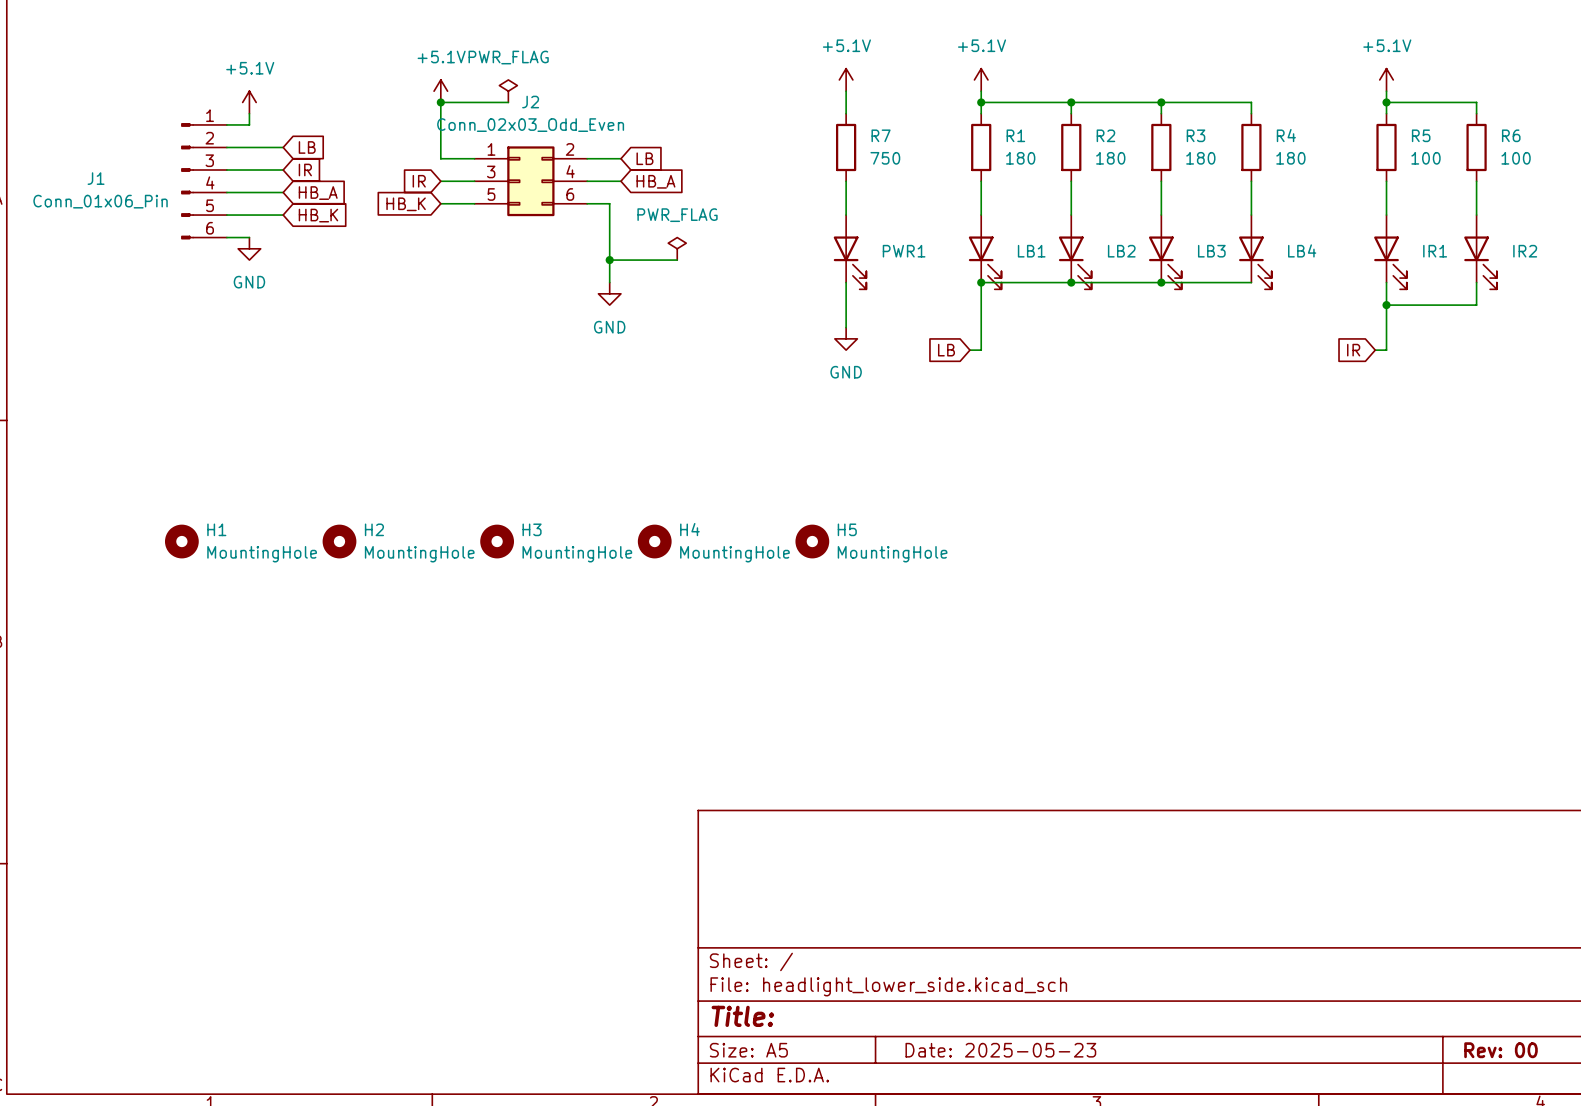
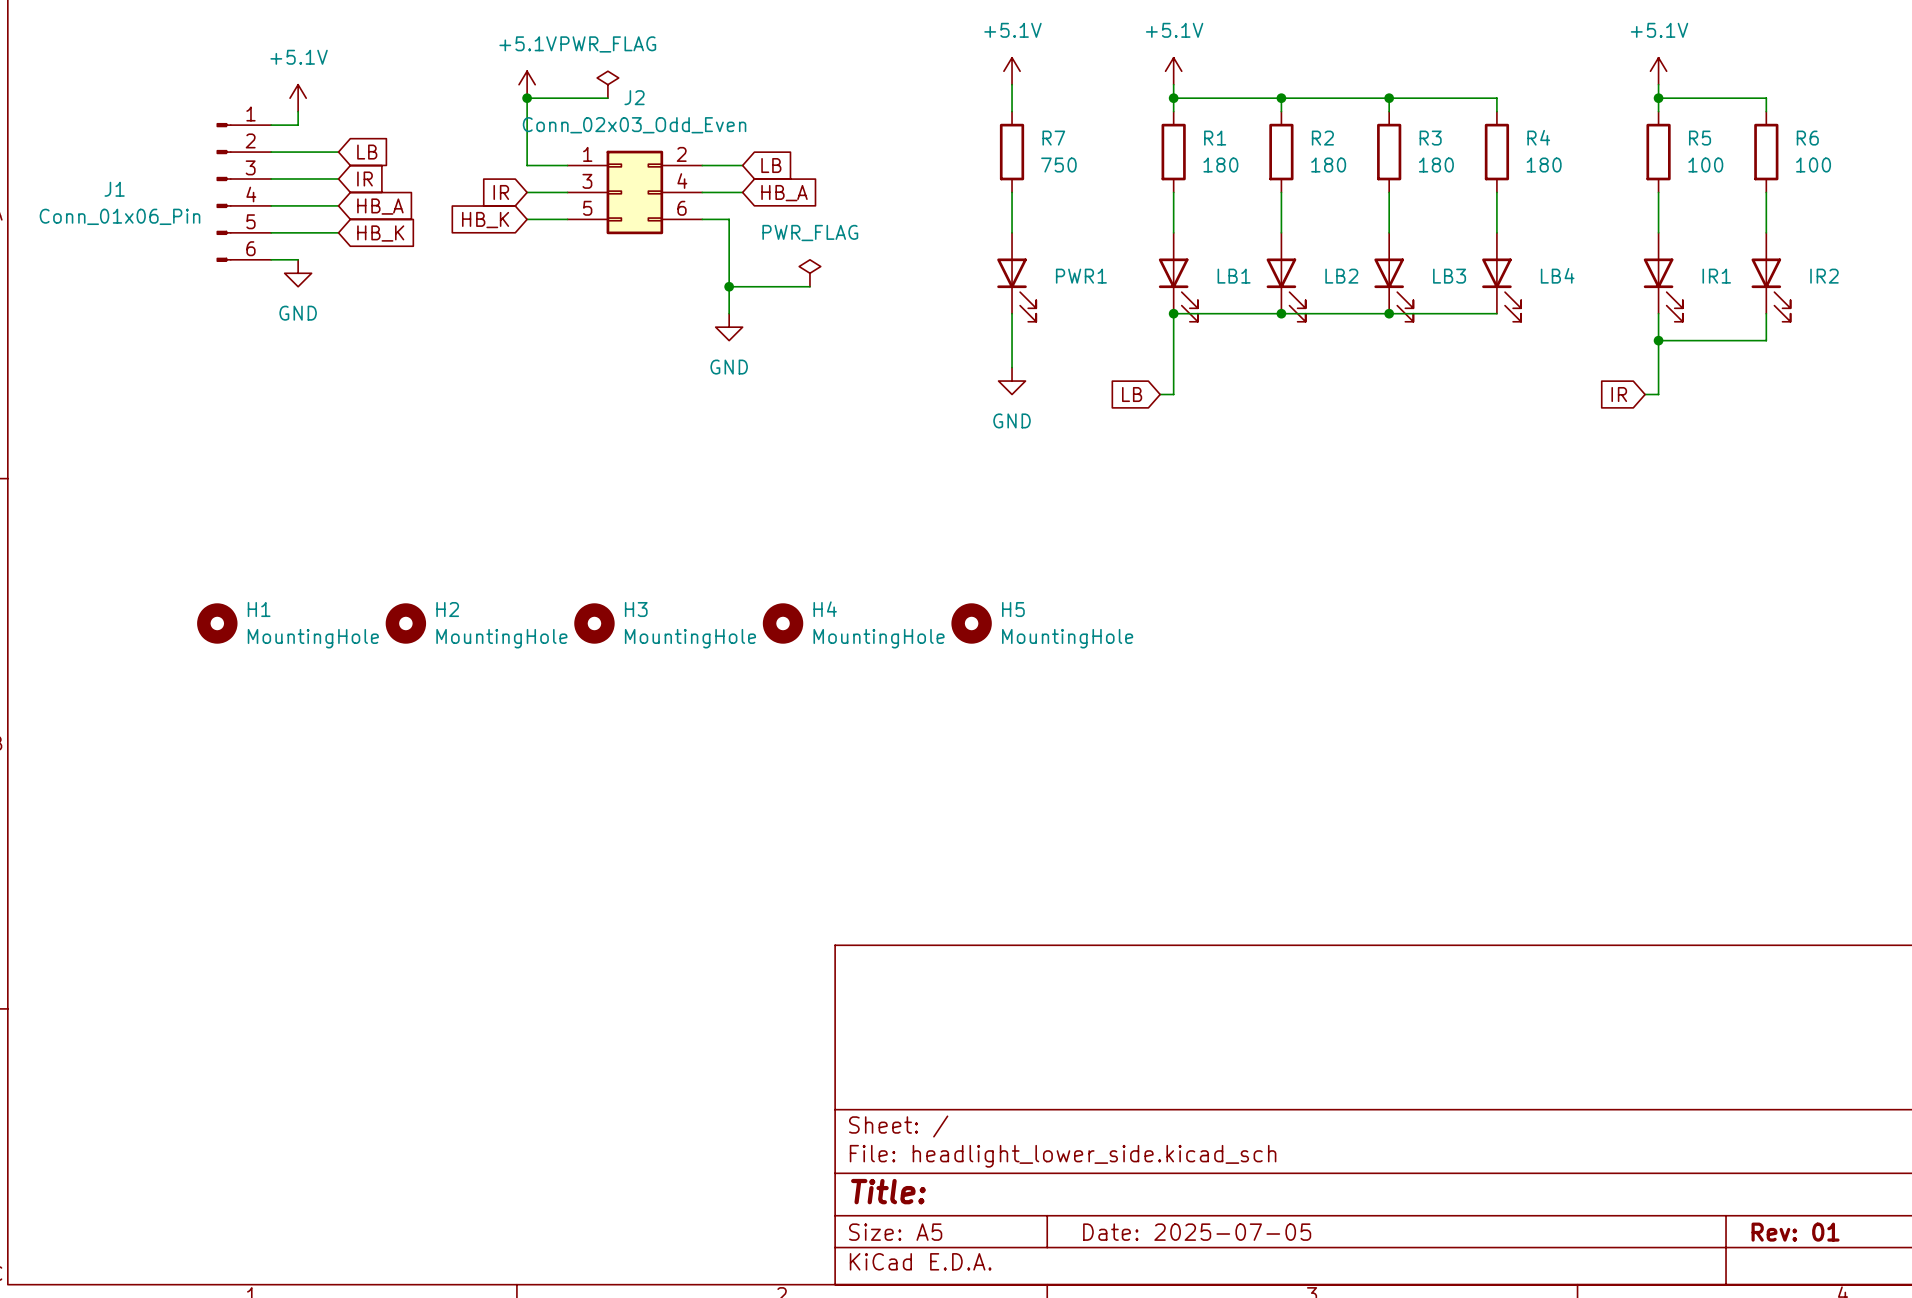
title block: Date: 2025-05-23 (1000, 1050) -> Date: 2025-07-05 (1197, 1232)
title block: Rev: 00 (1501, 1050) -> Rev: 01 (1795, 1232)

